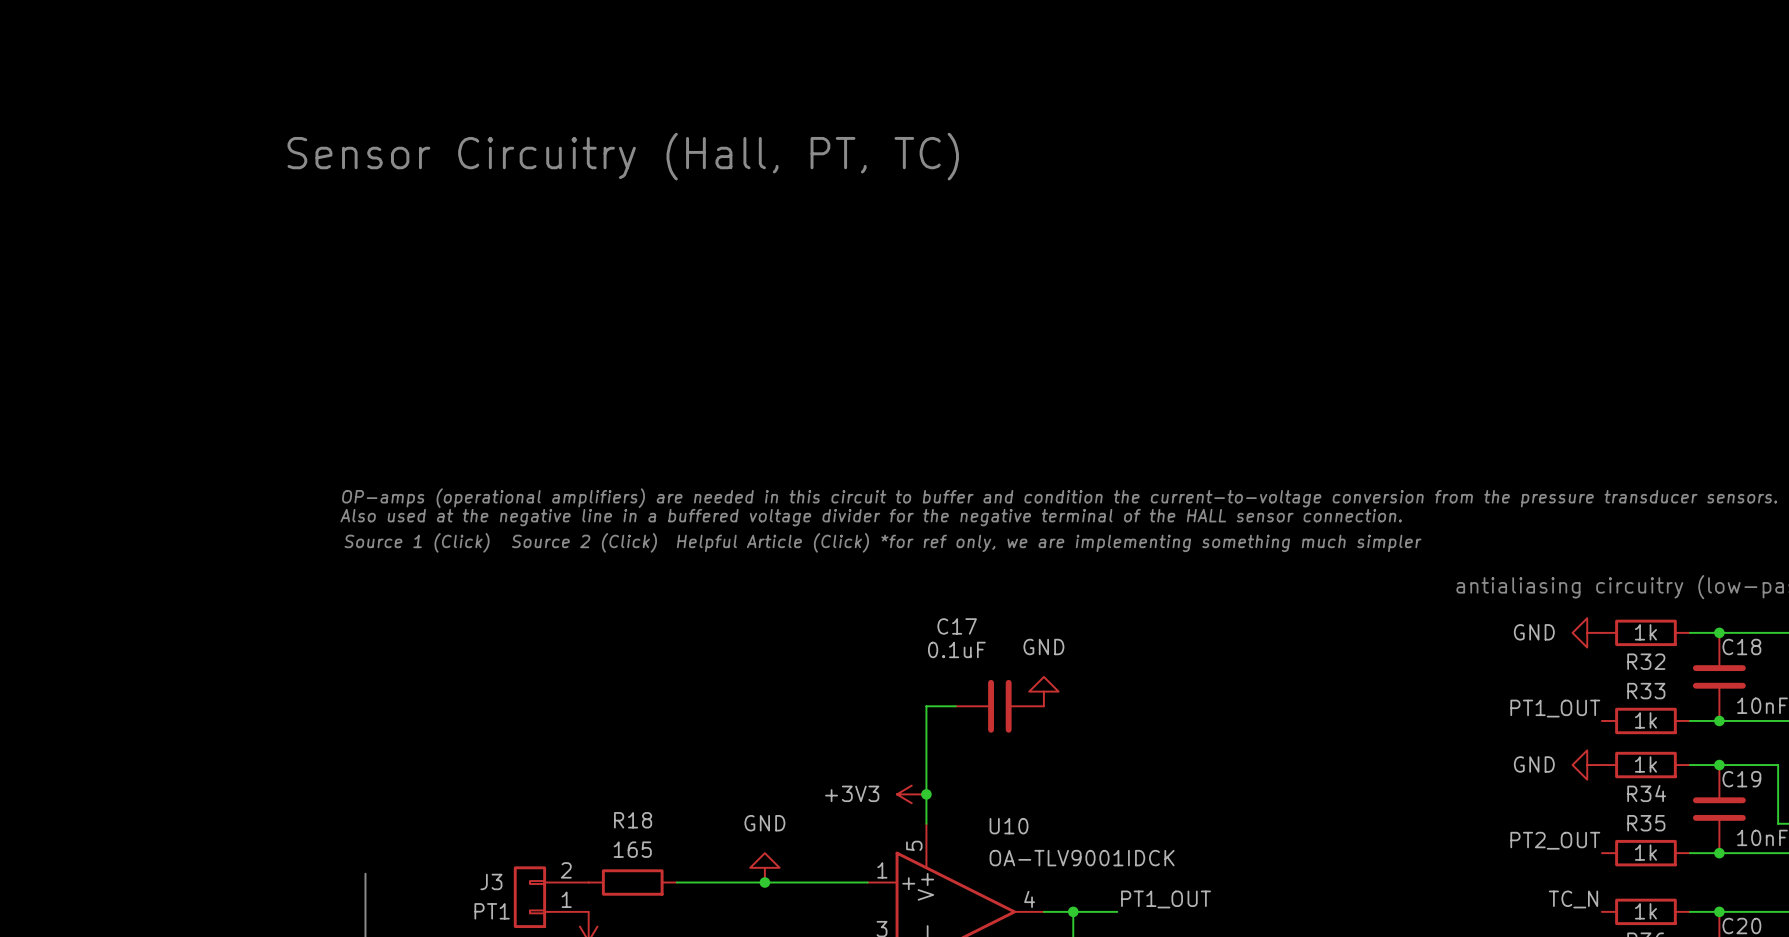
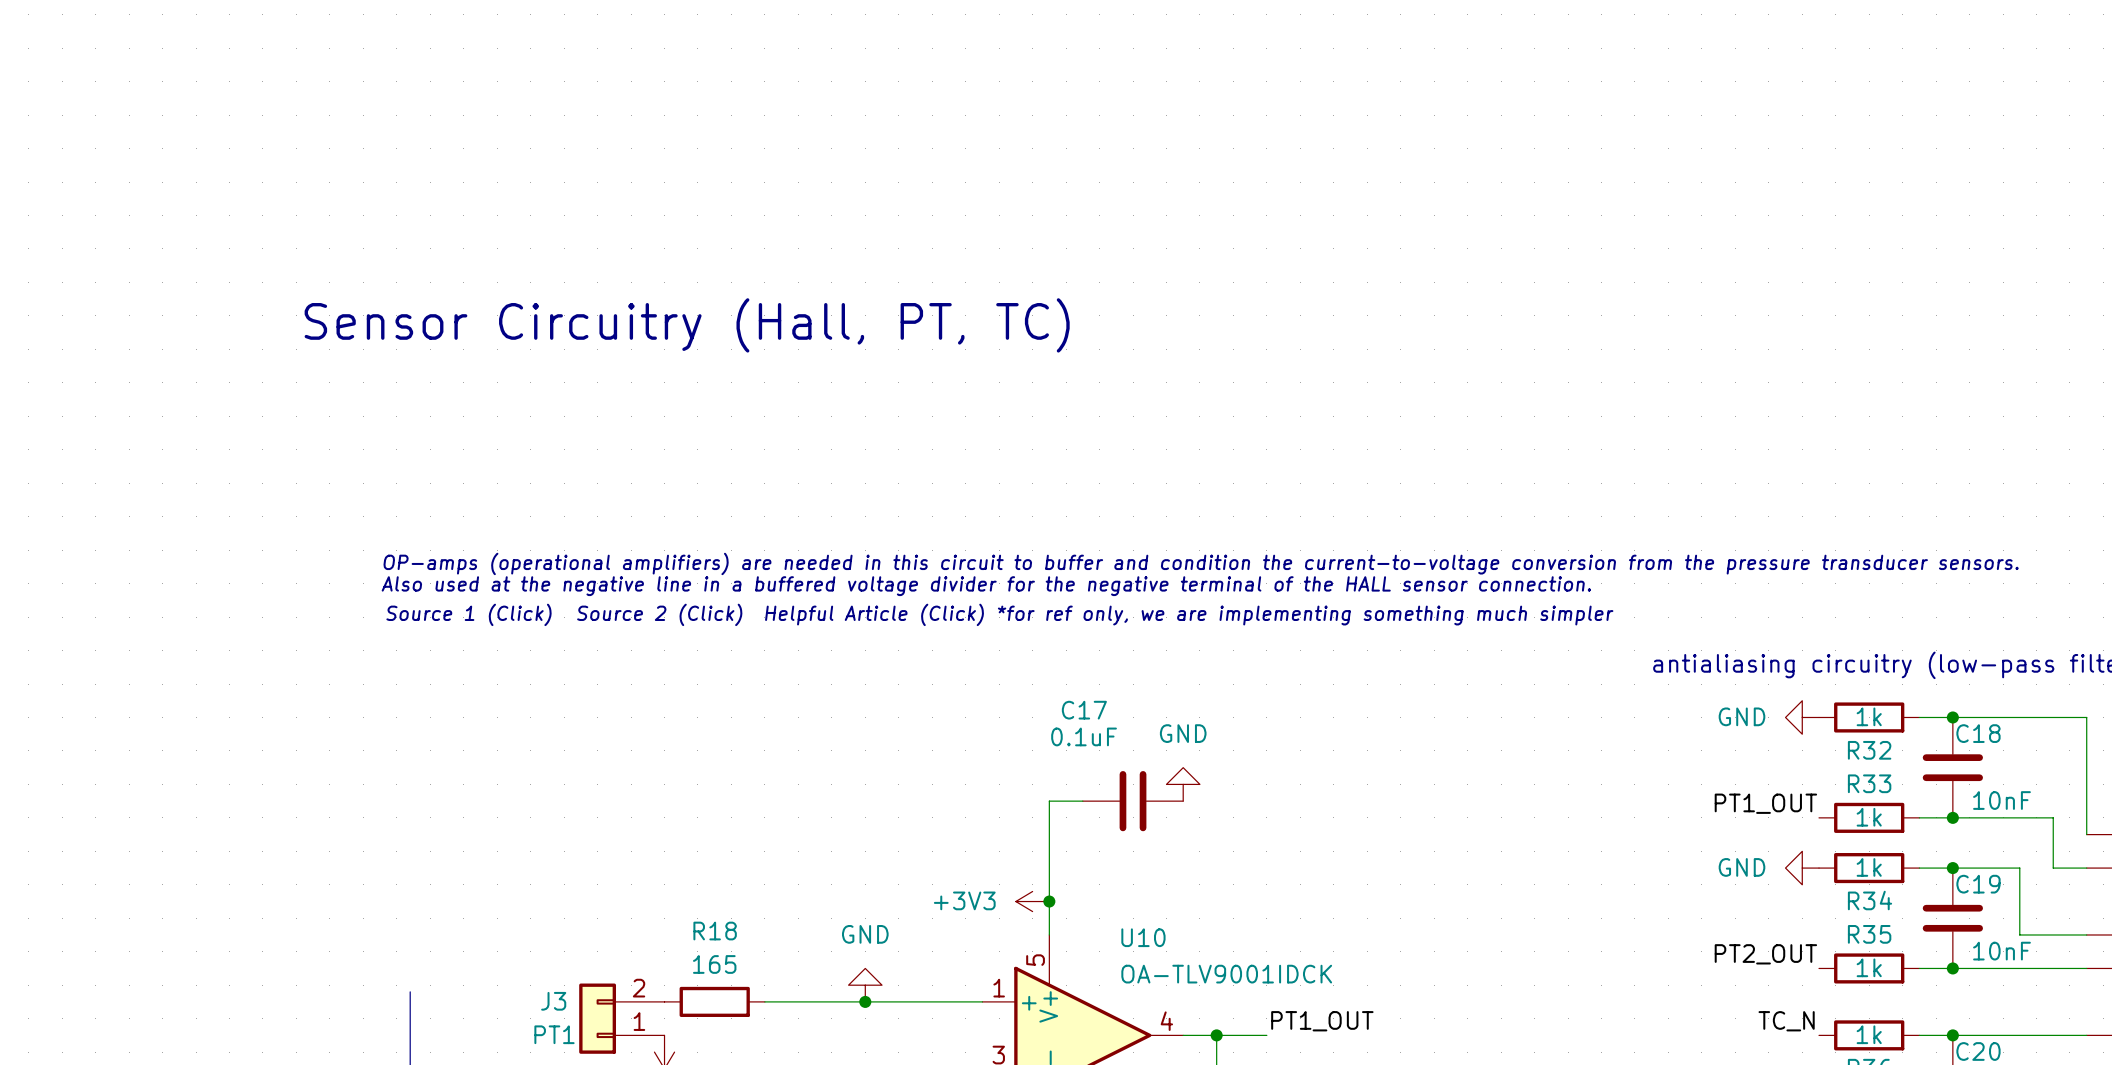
text position: Sensor Circuitry (Hall, PT, TC) (623, 156) -> Sensor Circuitry (Hall, PT, TC) (687, 325)

